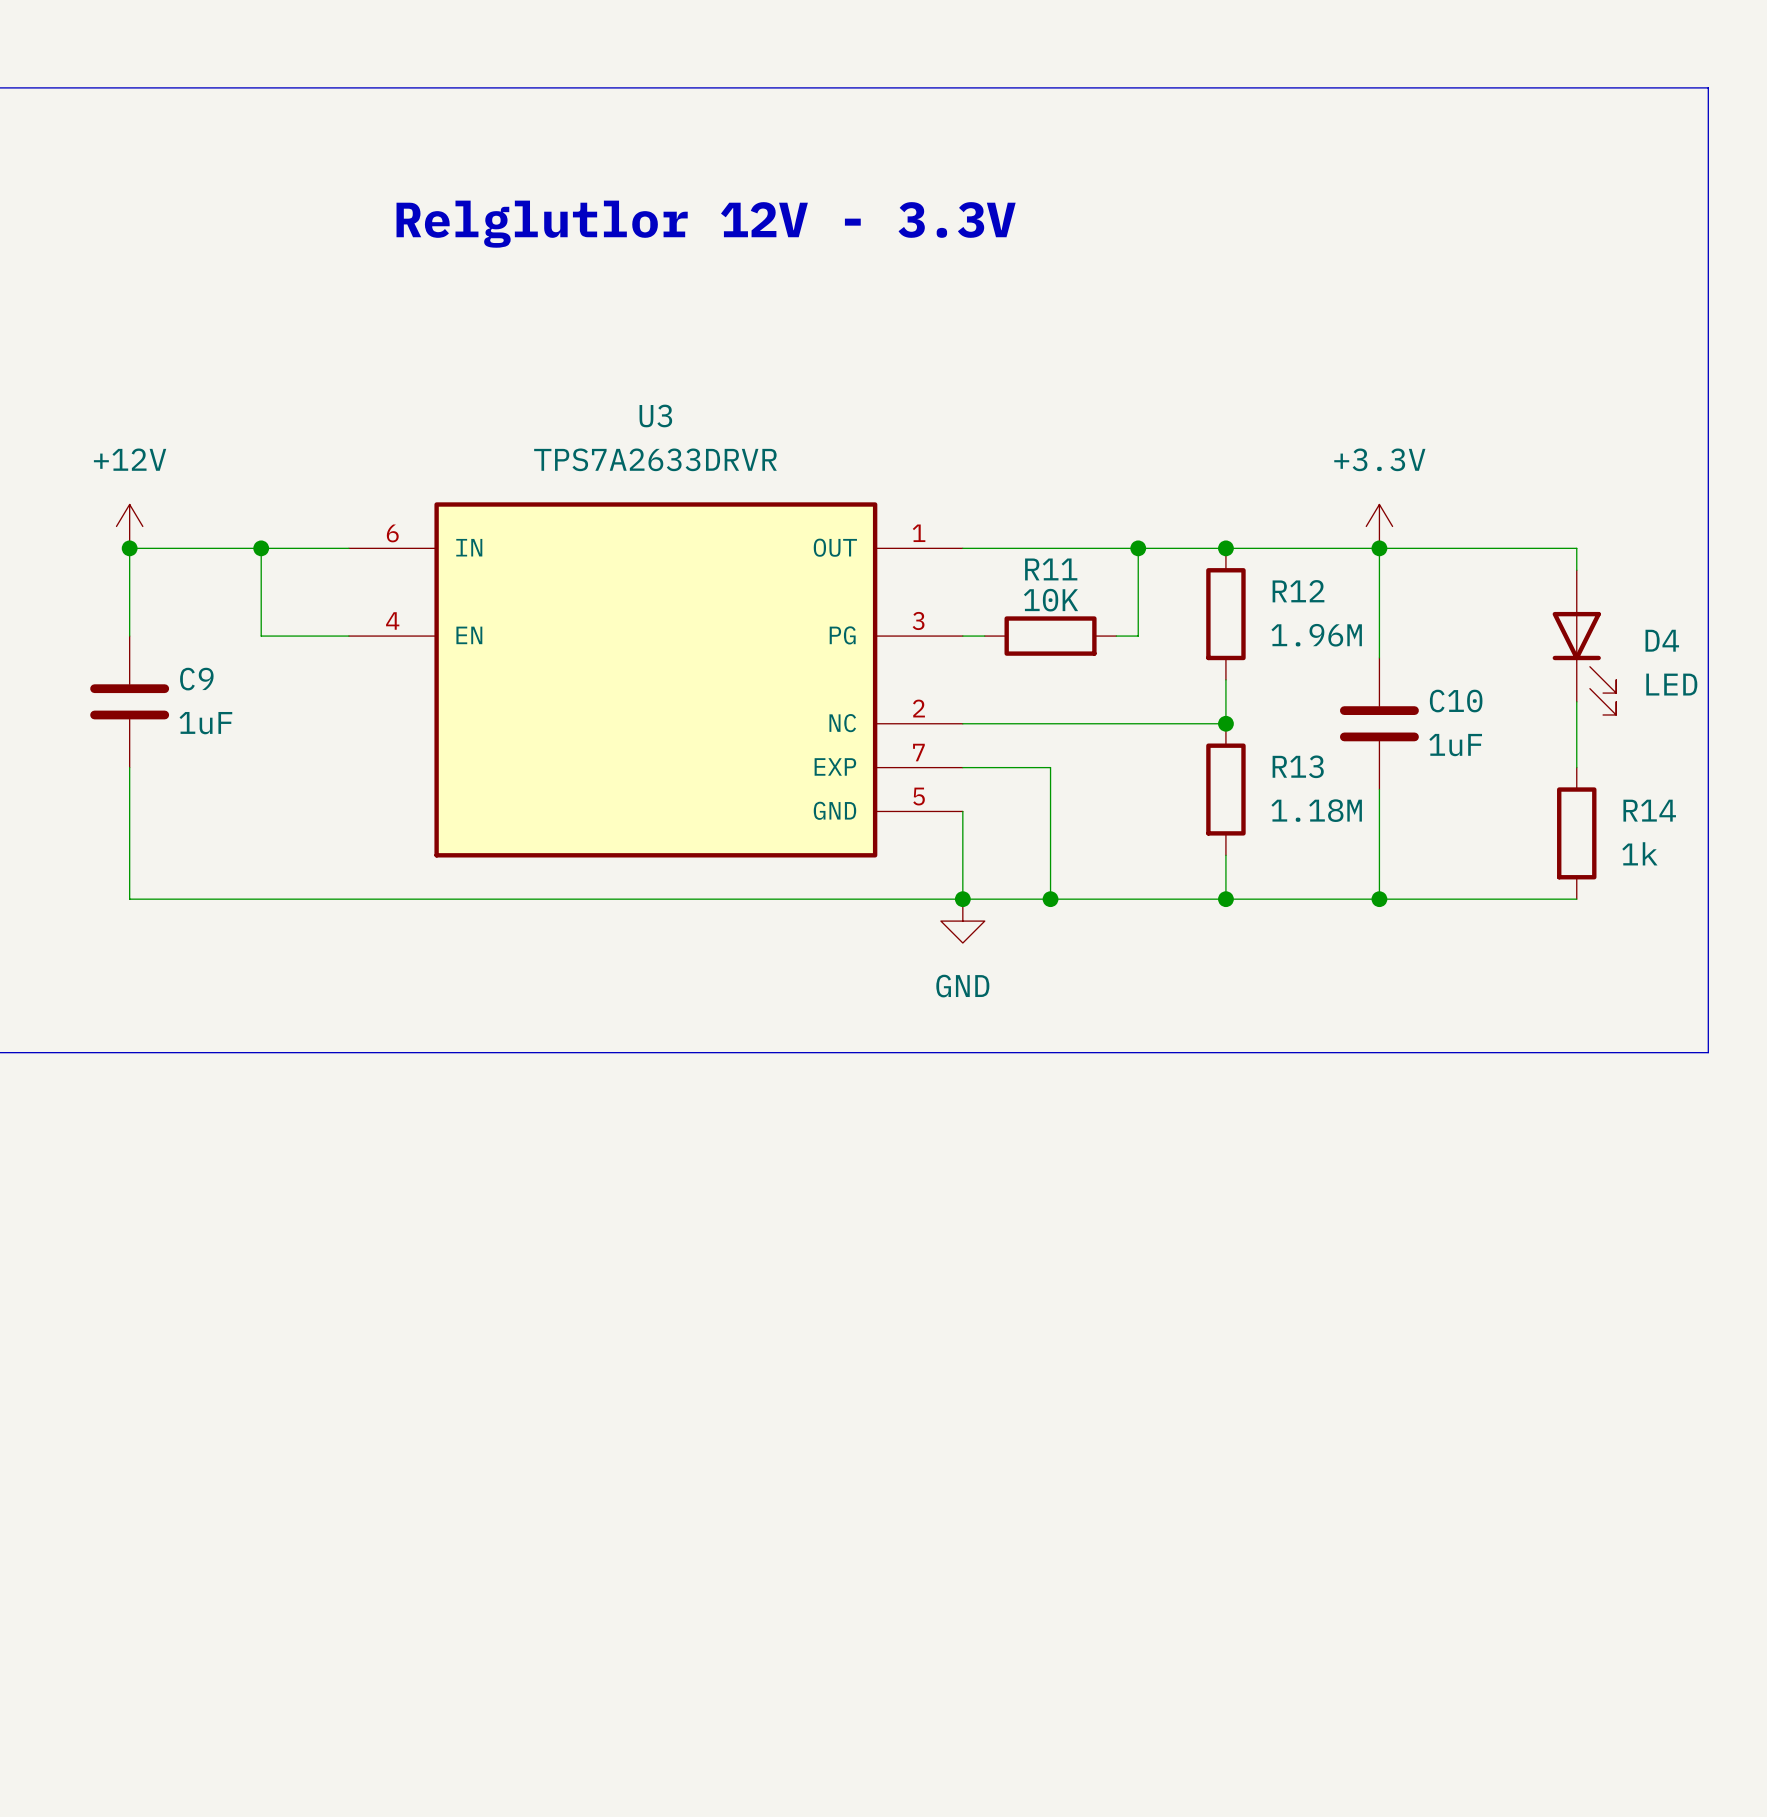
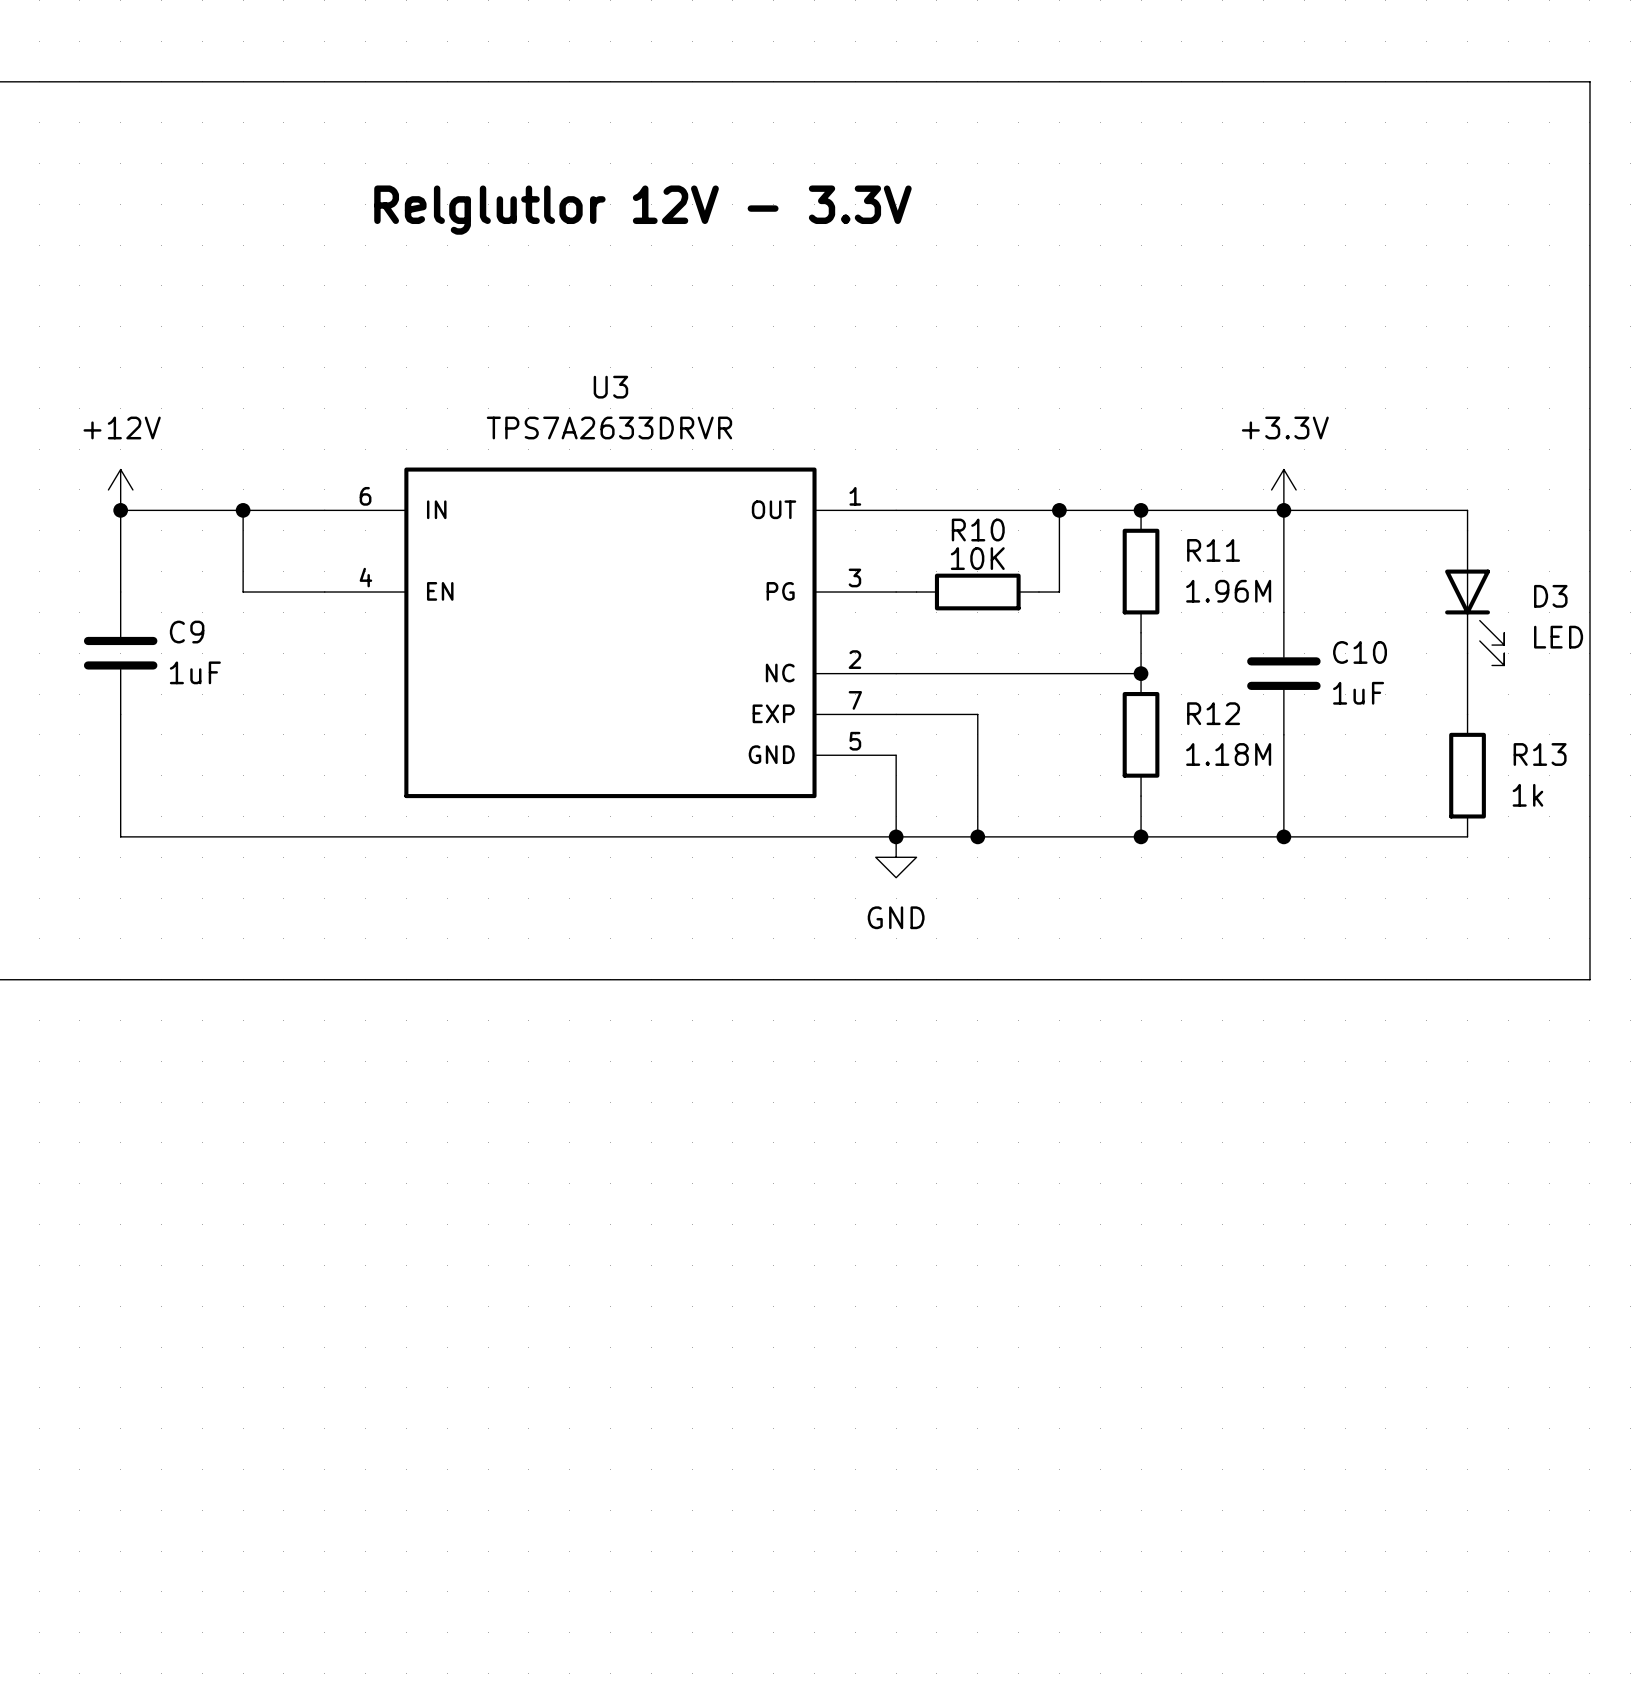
R11 name: R11 (1051, 569) -> R10 (978, 530)
R12 name: R12 (1298, 591) -> R11 (1213, 550)
D4 name: D4 (1662, 640) -> D3 (1550, 596)
R13 name: R13 (1298, 766) -> R12 (1213, 713)
R14 name: R14 (1649, 810) -> R13 (1540, 754)

